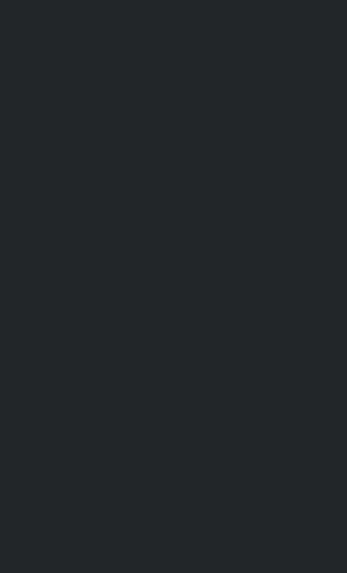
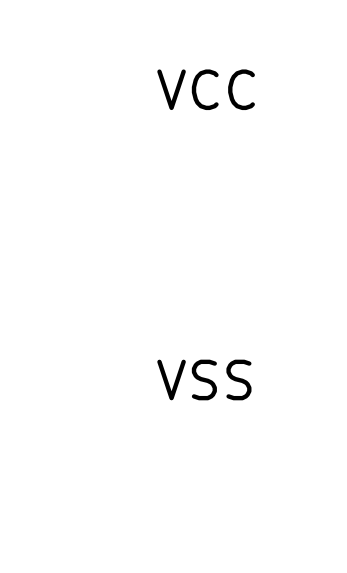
label: none -> VCC (206, 89)
label: none -> VSS (204, 379)

